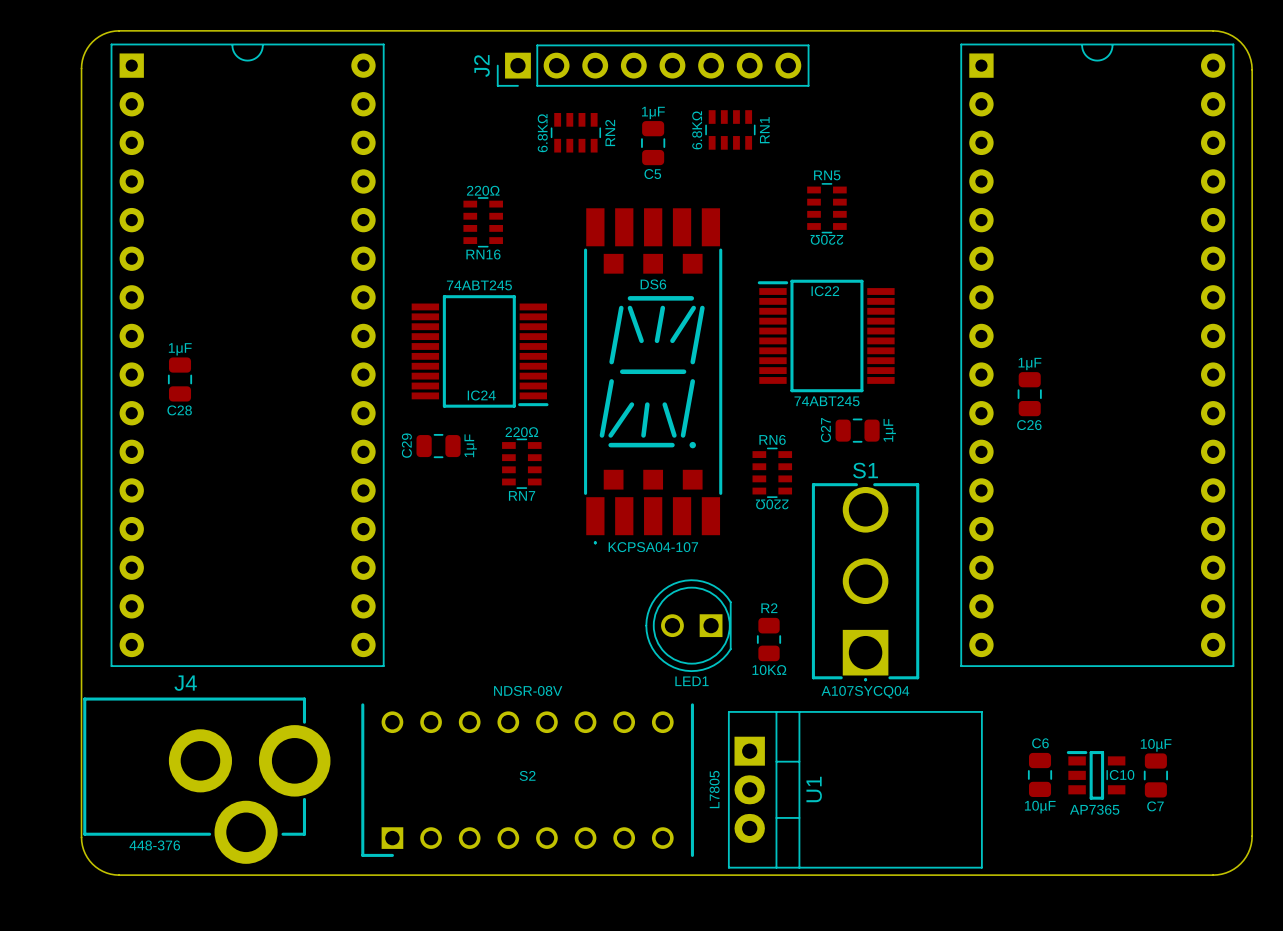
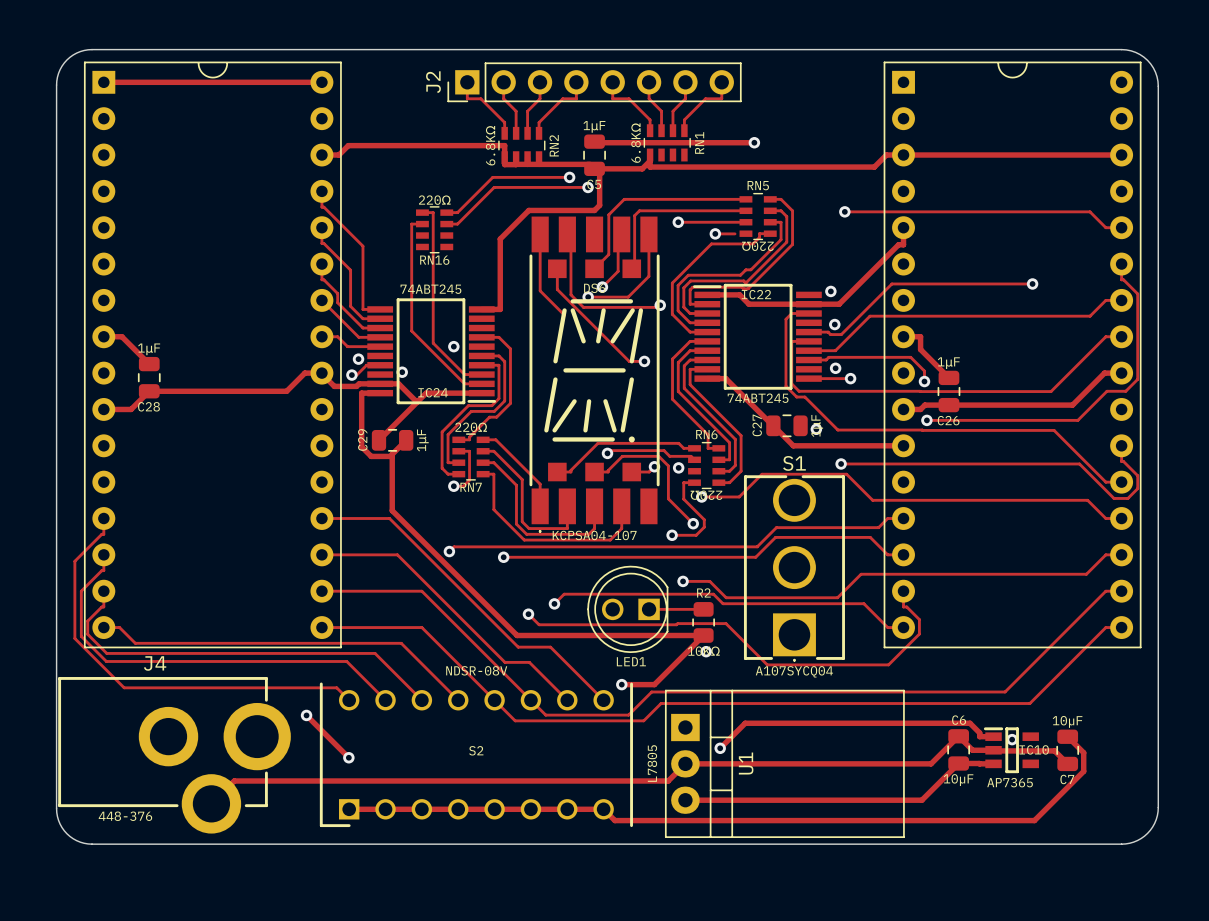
track: none -> (103, 82) (321, 82)
track: none -> (467, 82) (467, 98) (480, 98) (504, 122) (504, 133)
track: none -> (503, 82) (503, 98) (516, 111) (516, 133)
track: none -> (540, 82) (540, 98) (527, 111) (527, 133)
track: none -> (576, 82) (576, 98) (562, 98) (539, 122) (539, 133)
track: none -> (612, 82) (612, 98) (628, 98) (650, 119) (650, 130)
track: none -> (649, 82) (649, 98) (661, 111) (661, 130)
track: none -> (685, 82) (685, 98) (672, 111) (672, 130)
track: none -> (721, 82) (721, 98) (705, 98) (684, 119) (684, 130)
track: none -> (595, 142) (754, 142)
via: none -> (754, 142)
track: none -> (321, 155) (338, 155) (348, 145) (504, 145) (504, 164) (516, 164)
track: none -> (650, 155) (650, 167) (874, 167) (886, 155) (1121, 155)
track: none -> (650, 161) (642, 168) (594, 168) (599, 173) (599, 205) (594, 210) (528, 210) (500, 239) (500, 309) (481, 309)
track: none -> (516, 164) (590, 164)
track: none -> (569, 177) (492, 177) (457, 212) (446, 212)
via: none -> (569, 177)
track: none -> (588, 187) (494, 187) (457, 224) (446, 224)
via: none -> (588, 187)
track: none -> (321, 191) (321, 207) (362, 246) (362, 309) (380, 309)
track: none -> (745, 199) (624, 199) (608, 214) (608, 254) (594, 268)
track: none -> (770, 199) (781, 199) (792, 210) (792, 244) (748, 288) (692, 287) (690, 289) (690, 304) (707, 304)
track: none -> (745, 210) (639, 210) (634, 215) (634, 265)
track: none -> (770, 210) (781, 210) (786, 216) (786, 242) (746, 282) (690, 280) (683, 287) (683, 307) (690, 313) (707, 313)
track: none -> (844, 211) (1089, 211) (1105, 227) (1121, 227)
via: none -> (844, 211)
track: none -> (422, 212) (433, 212) (433, 343) (464, 374) (481, 374)
track: none -> (678, 222) (745, 222)
via: none -> (678, 222)
track: none -> (770, 222) (781, 222) (781, 239) (750, 269) (745, 269) (740, 275) (688, 275) (678, 285) (678, 310) (690, 322) (707, 322)
track: none -> (422, 224) (411, 224) (411, 330) (464, 383) (481, 383)
track: none -> (321, 227) (321, 243) (350, 270) (350, 306) (362, 318) (380, 318)
track: none -> (903, 227) (903, 244) (898, 244) (839, 304) (749, 304) (739, 294) (707, 294)
track: none -> (715, 233) (735, 233)
via: none -> (715, 233)
track: none -> (770, 233) (759, 233) (759, 237) (753, 243) (711, 243) (672, 283) (672, 314) (690, 332) (707, 332)
track: none -> (540, 234) (540, 290) (564, 315)
track: none -> (648, 234) (648, 276) (628, 297) (588, 297)
track: none -> (570, 238) (570, 294) (583, 307) (658, 307) (660, 305)
track: none -> (618, 238) (618, 271) (602, 287)
track: none -> (321, 264) (321, 279) (337, 293) (337, 302) (362, 328) (380, 328)
track: none -> (1121, 264) (1121, 279) (1137, 293) (1137, 379) (1125, 391) (1106, 391) (1077, 420) (926, 420)
track: none -> (557, 268) (557, 289) (629, 361) (644, 361)
track: none -> (1032, 283) (891, 283) (841, 334) (808, 332)
via: none -> (1032, 283)
via: none -> (602, 287)
via: none -> (830, 291)
via: none -> (588, 297)
track: none -> (321, 300) (358, 337) (380, 337)
track: none -> (1121, 300) (1105, 300) (1090, 316) (869, 316) (835, 350) (808, 350)
via: none -> (660, 305)
track: none -> (808, 313) (791, 313) (785, 319) (785, 386) (796, 397) (804, 397) (837, 430) (1054, 430) (1105, 482) (1121, 482)
via: none -> (834, 324)
track: none -> (103, 336) (121, 336) (149, 364)
track: none -> (321, 336) (337, 336) (347, 346) (380, 346)
track: none -> (903, 336) (920, 336) (920, 349) (948, 377)
track: none -> (1121, 336) (1105, 336) (1051, 391) (799, 391) (791, 383) (791, 341) (808, 341)
track: none -> (481, 337) (498, 337) (510, 348) (510, 403) (496, 417) (489, 417) (469, 437) (469, 439) (458, 439)
track: none -> (707, 341) (690, 341) (672, 359) (672, 399) (708, 434) (708, 448) (718, 448)
via: none -> (453, 346)
track: none -> (707, 350) (690, 350) (678, 362) (678, 391) (729, 442) (729, 459) (718, 459)
track: none -> (481, 355) (498, 355) (504, 361) (504, 401) (494, 411) (471, 411) (448, 434) (448, 462) (458, 462)
via: none -> (358, 359)
track: none -> (707, 360) (690, 360) (684, 365) (684, 388) (735, 439) (735, 465) (729, 471) (718, 471)
track: none -> (808, 360) (826, 360) (828, 357) (910, 357) (924, 371) (924, 381)
via: none -> (644, 361)
track: none -> (380, 365) (366, 365) (356, 375) (351, 375)
track: none -> (481, 365) (498, 365) (498, 398) (491, 405) (468, 405) (442, 431) (442, 468) (448, 474) (458, 474)
via: none -> (835, 368)
track: none -> (707, 369) (690, 369) (690, 384) (741, 435) (741, 471) (729, 482) (718, 482)
via: none -> (402, 372)
track: none -> (1121, 373) (1104, 373) (1072, 405) (924, 405) (920, 409) (903, 409)
via: none -> (351, 375)
track: none -> (707, 378) (725, 378) (773, 425)
track: none -> (808, 378) (850, 378)
via: none -> (850, 378)
via: none -> (924, 381)
track: none -> (380, 393) (361, 393) (361, 446) (371, 456) (392, 456)
track: none -> (481, 393) (426, 393) (378, 440)
track: none -> (417, 402) (398, 383) (359, 383) (356, 386) (334, 386) (321, 373) (304, 373) (286, 391) (149, 391) (131, 409) (103, 409)
via: none -> (926, 420)
track: none -> (773, 425) (793, 445) (903, 445)
via: none -> (816, 429)
track: none -> (483, 439) (495, 439) (540, 484) (540, 506)
track: none -> (406, 440) (392, 454) (392, 510) (517, 635) (703, 635) (654, 684) (621, 684)
track: none -> (1121, 445) (1121, 461) (1137, 475) (1137, 488) (1127, 498) (1114, 498) (1079, 463) (841, 463)
track: none -> (694, 448) (683, 448) (678, 443) (597, 443) (570, 472) (557, 472)
track: none -> (458, 451) (469, 451) (469, 480) (463, 486) (453, 486)
track: none -> (483, 451) (493, 451) (522, 479) (522, 521) (529, 528) (567, 528) (567, 506)
track: none -> (607, 453) (610, 450) (664, 450) (669, 456) (691, 456) (694, 459)
via: none -> (607, 453)
track: none -> (483, 462) (493, 462) (516, 485) (516, 524) (526, 534) (588, 534) (594, 528) (594, 506)
via: none -> (841, 463)
track: none -> (654, 466) (649, 472) (631, 472)
via: none -> (654, 466)
via: none -> (678, 467)
track: none -> (594, 472) (608, 472) (622, 456) (658, 456) (668, 465) (668, 498) (693, 523)
track: none -> (483, 474) (493, 474) (493, 509) (524, 540) (610, 540) (621, 528) (621, 506)
track: none -> (694, 482) (683, 482) (683, 499) (704, 519) (704, 527) (696, 535) (672, 535)
via: none -> (453, 486)
track: none -> (701, 496) (739, 496) (761, 474) (846, 474) (872, 500) (1087, 500) (1105, 518) (1121, 518)
via: none -> (701, 496)
track: none -> (103, 518) (103, 534) (74, 561) (74, 638) (124, 687) (336, 687) (349, 700)
track: none -> (321, 518) (389, 518) (518, 647) (550, 647) (603, 700)
track: none -> (903, 518) (887, 518) (878, 527) (776, 527) (757, 546) (454, 546) (449, 551)
via: none -> (693, 523)
via: none -> (672, 535)
via: none -> (449, 551)
track: none -> (103, 554) (103, 570) (81, 591) (81, 636) (106, 661) (346, 661) (385, 700)
track: none -> (321, 554) (397, 554) (505, 662) (529, 662) (567, 700)
track: none -> (903, 554) (887, 554) (870, 537) (775, 537) (755, 557) (503, 557)
track: none -> (1121, 554) (1105, 554) (1086, 574) (861, 574) (837, 597) (726, 597) (709, 581) (683, 581)
via: none -> (503, 557)
via: none -> (683, 581)
track: none -> (103, 591) (103, 606) (87, 621) (87, 634) (106, 653) (375, 653) (421, 700)
track: none -> (321, 591) (421, 591) (545, 715) (628, 715) (651, 692) (1005, 692) (1105, 591) (1121, 591)
track: none -> (903, 591) (903, 606) (906, 606) (919, 619) (919, 634) (888, 664) (767, 664) (726, 623) (539, 624) (528, 614)
track: none -> (554, 603) (564, 594) (713, 594) (723, 603) (863, 603) (887, 627) (903, 627)
via: none -> (554, 603)
track: none -> (649, 609) (703, 609)
via: none -> (528, 614)
track: none -> (103, 627) (119, 627) (135, 643) (401, 643) (458, 700)
track: none -> (321, 627) (421, 627) (515, 720) (643, 720) (661, 703) (1029, 703) (1105, 627) (1121, 627)
via: none -> (706, 651)
via: none -> (621, 684)
track: none -> (306, 715) (348, 757)
via: none -> (306, 715)
track: none -> (993, 736) (979, 736) (979, 732) (970, 723) (745, 723) (720, 748)
track: none -> (1067, 736) (1083, 752) (1083, 771) (1034, 820) (614, 820) (603, 809) (349, 809)
via: none -> (1012, 739)
via: none -> (720, 748)
track: none -> (993, 750) (972, 750) (958, 736) (931, 763) (685, 763) (668, 781) (234, 781) (211, 803)
track: none -> (994, 750) (1054, 750) (1067, 763)
via: none -> (348, 757)
track: none -> (993, 763) (958, 763) (921, 800) (685, 800)

